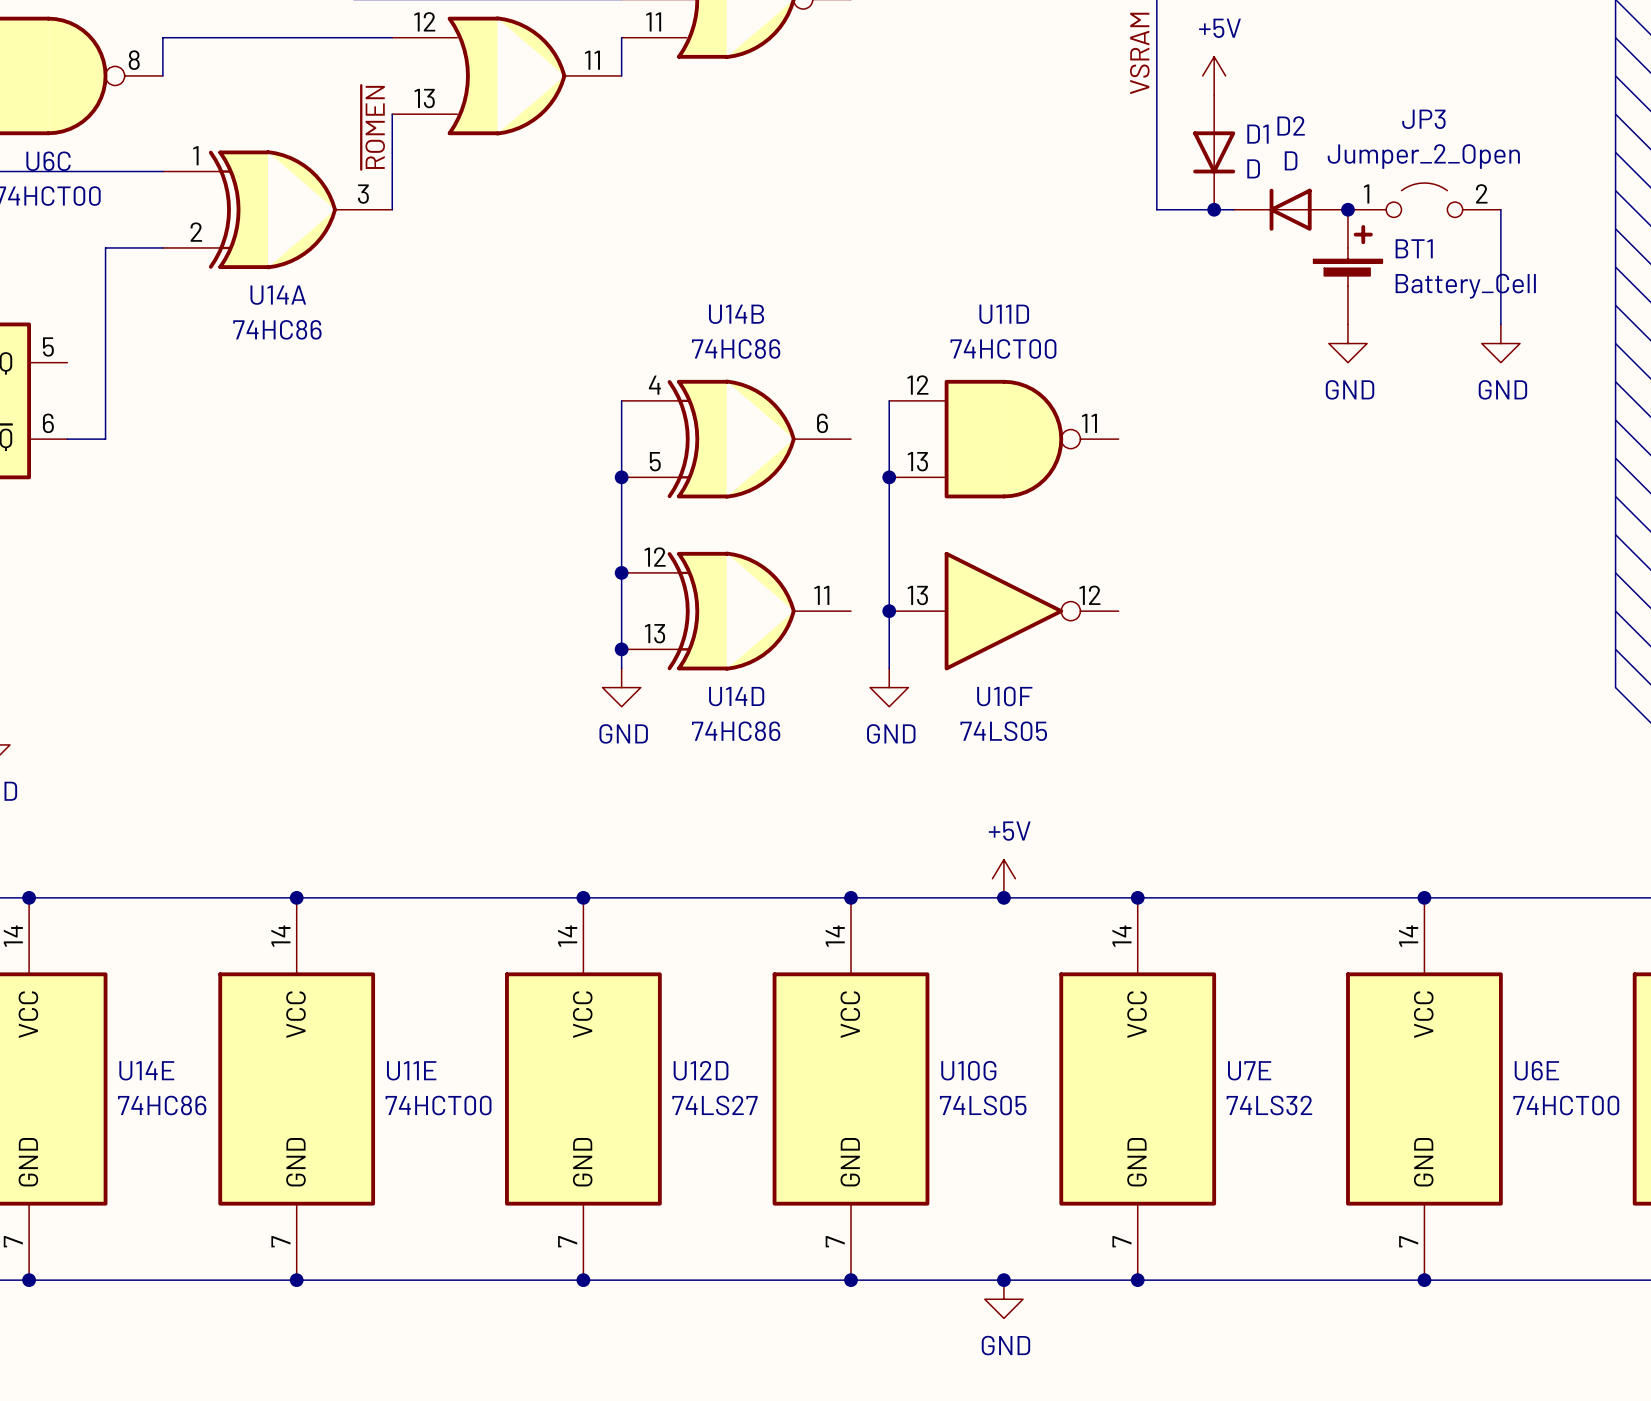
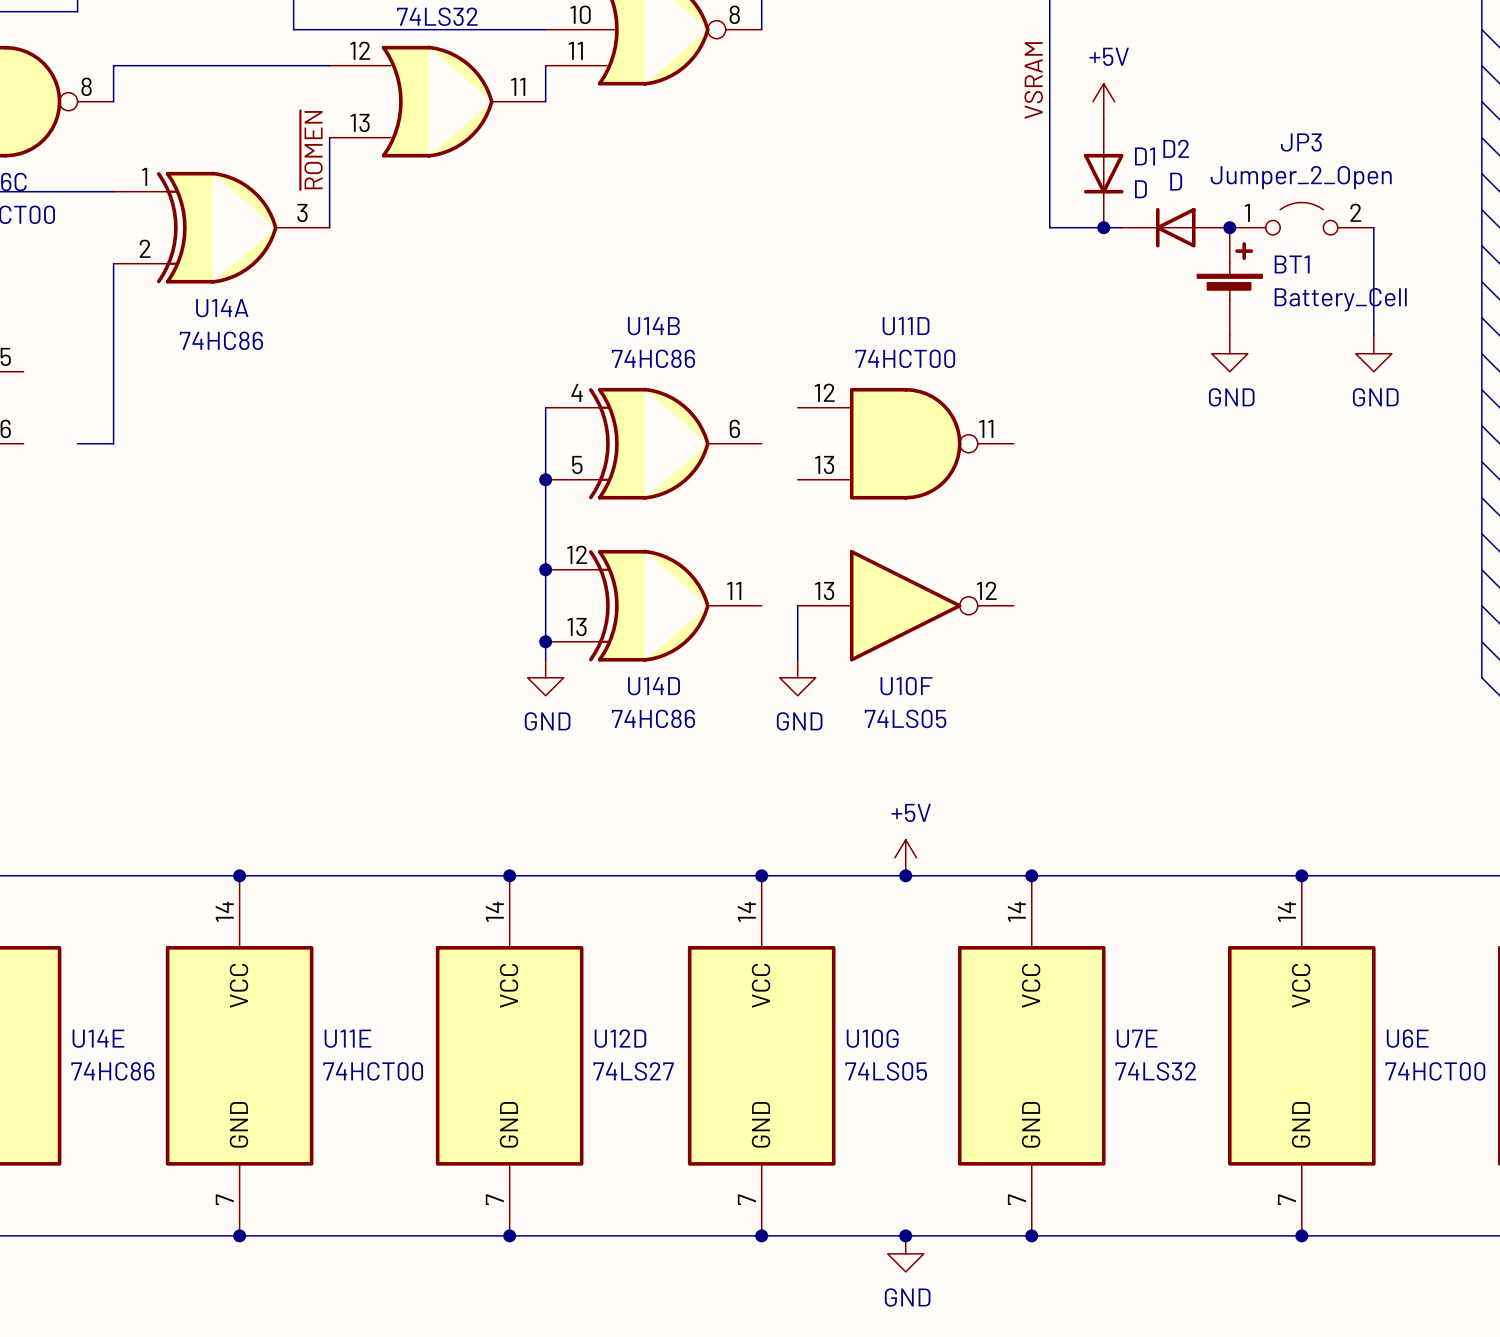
wire: (162, 247) (105, 247) (105, 439) (67, 439) -> (113, 263) (113, 443) (77, 443)
wire: (889, 400) (889, 611) -> none
junction: (889, 477) -> none
junction: (889, 611) -> none

